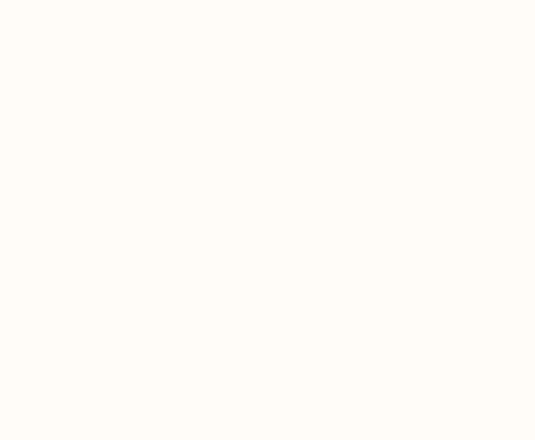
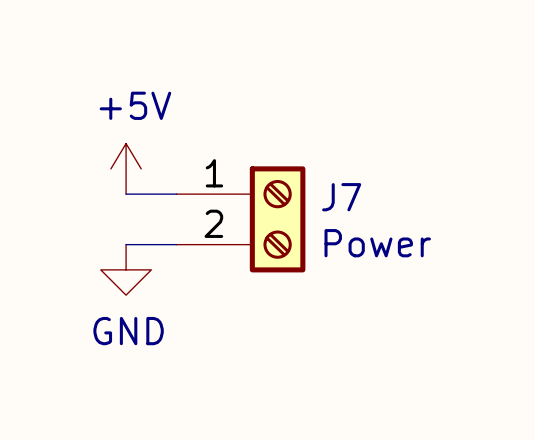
power symbol: none -> +5V (126, 168)
wire: none -> (126, 194) (176, 194)
J7: none -> Power (240, 219)
wire: none -> (126, 244) (176, 244)
power symbol: none -> GND (126, 269)

